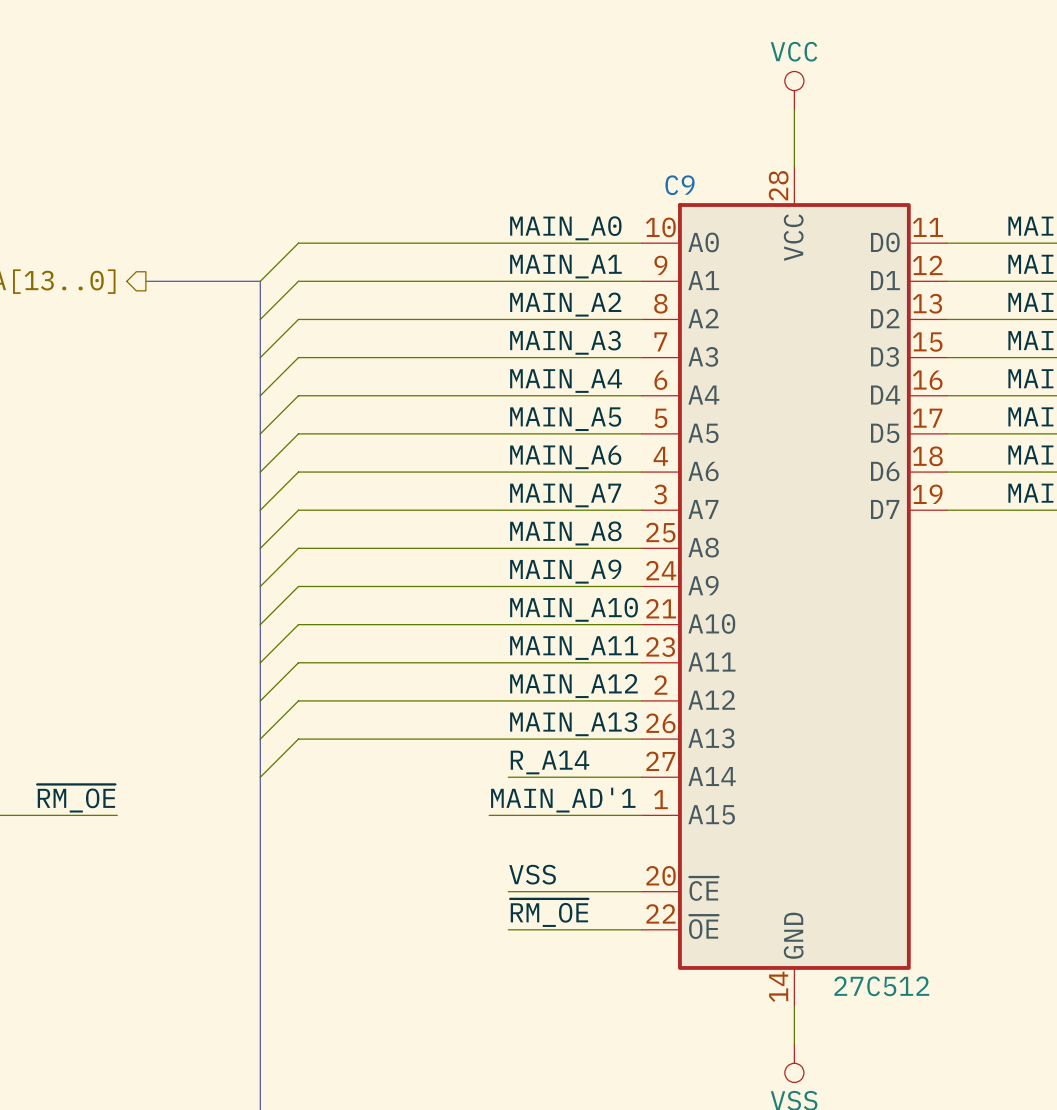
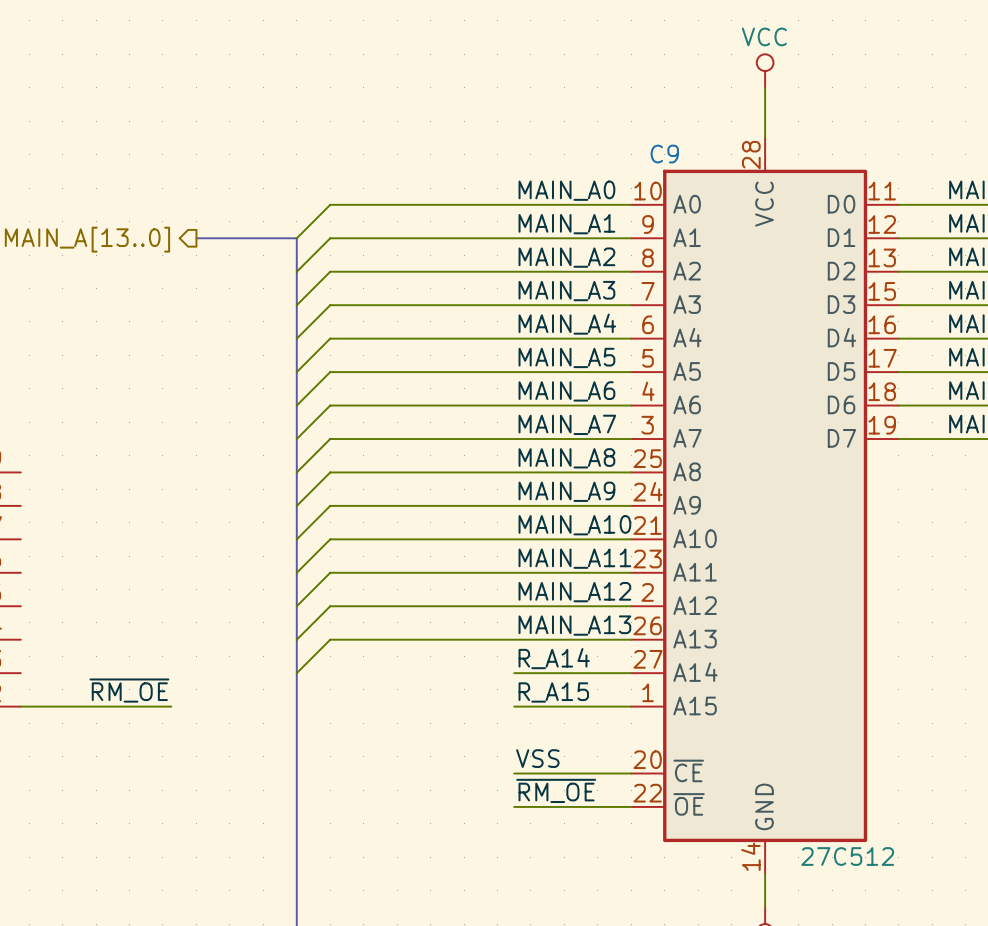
label: none -> R_A15 (553, 692)
label: MAIN_AD'1 (563, 800) -> none
wire: (489, 815) (508, 815) -> none

